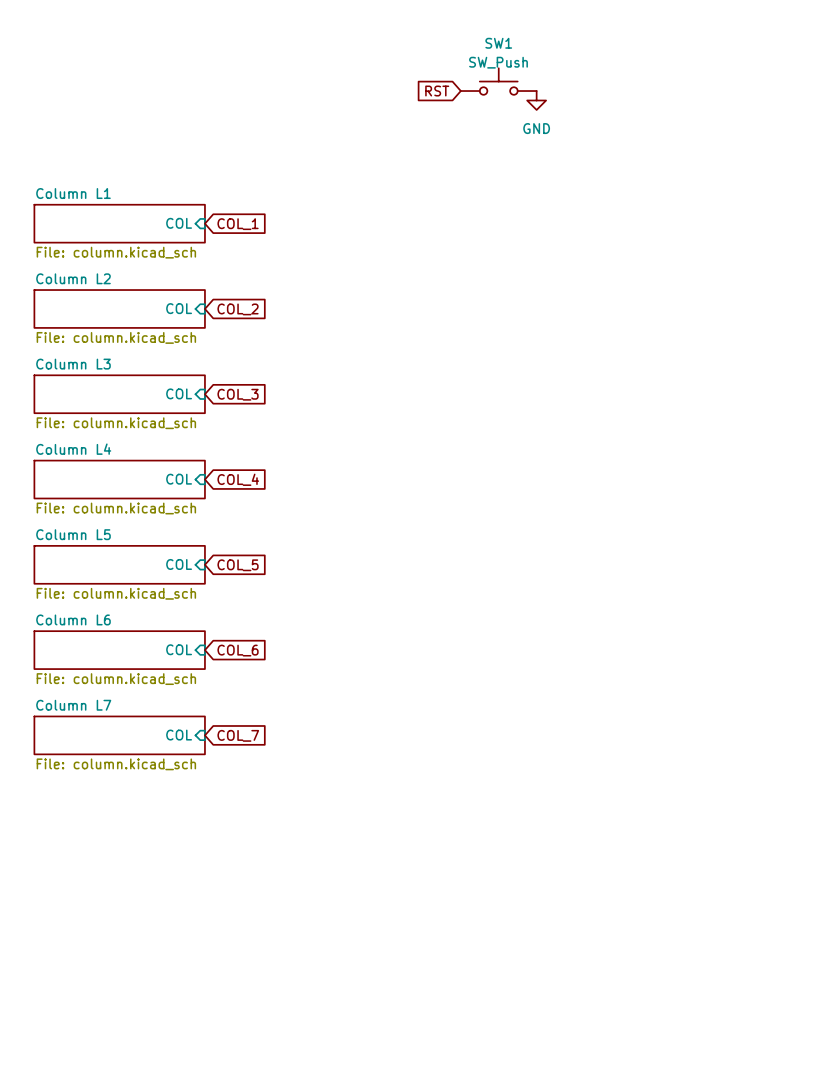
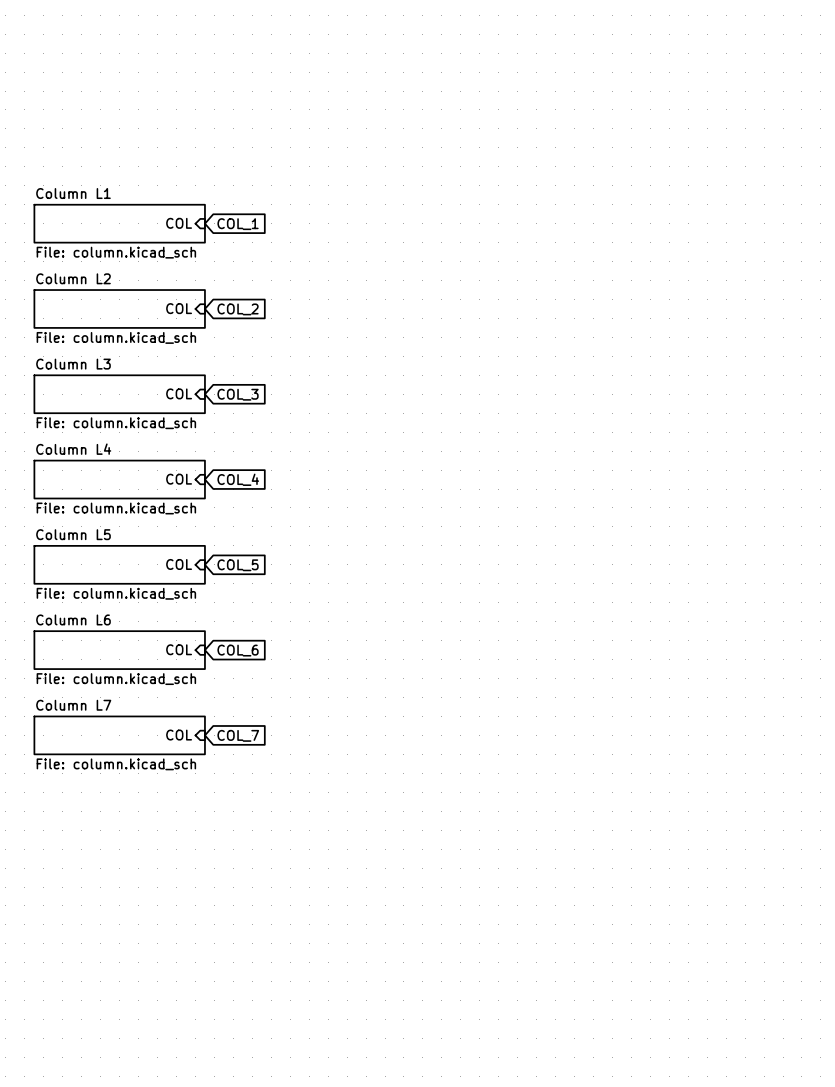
SW1: SW_Push (498, 81) -> none
global label: RST (437, 91) -> none
power symbol: GND (536, 100) -> none

